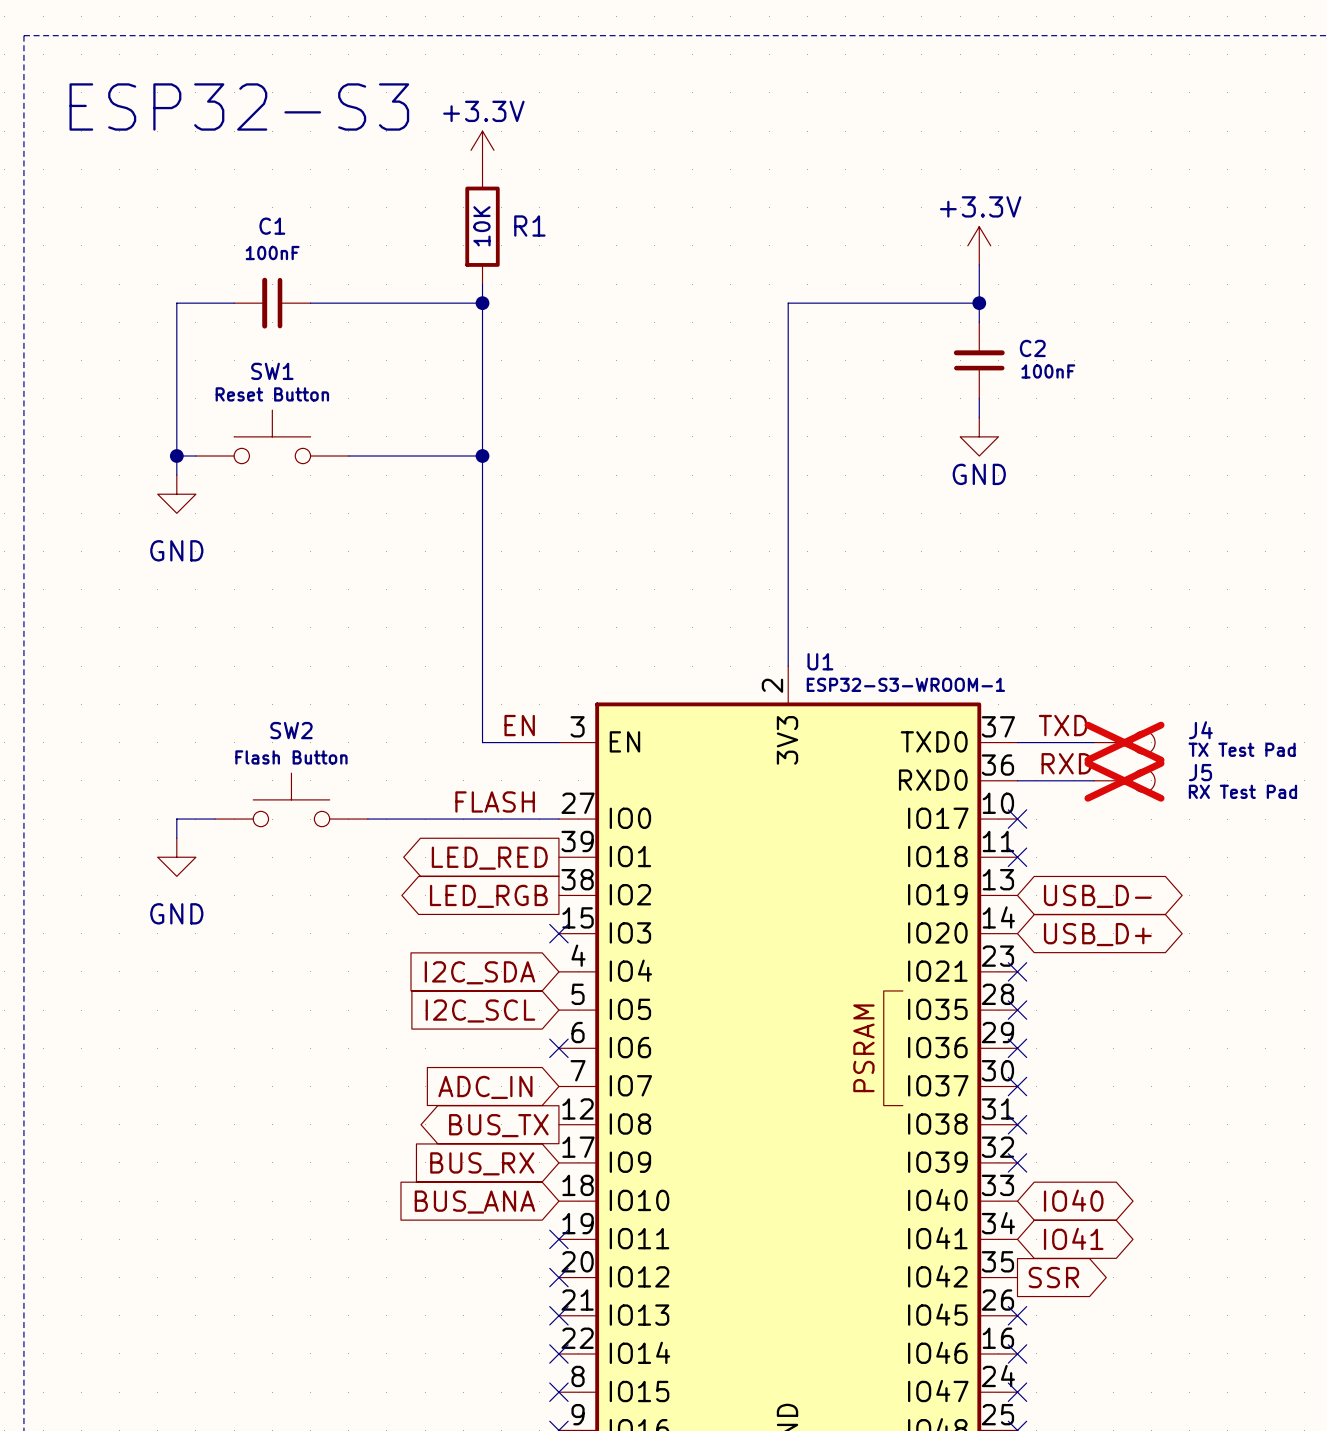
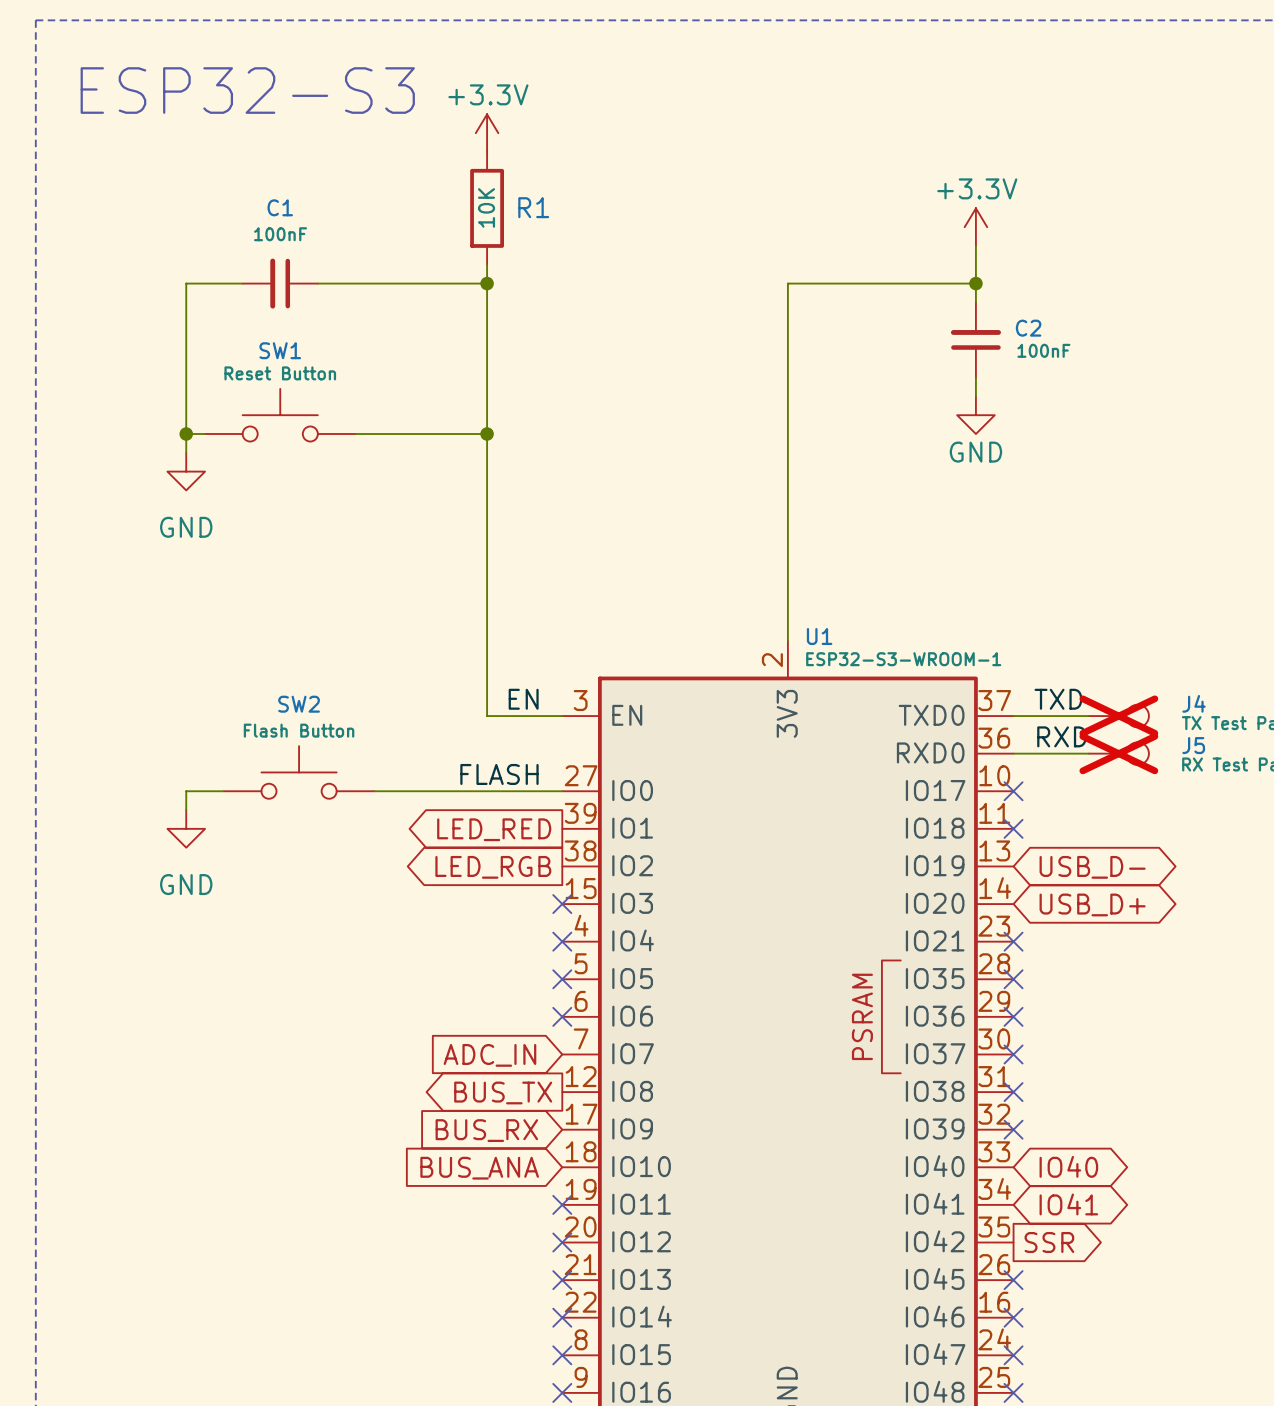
no-connect mark: none -> (562, 941)
global label: I2C_SDA (479, 972) -> none
global label: I2C_SCL (480, 1010) -> none
no-connect mark: none -> (562, 979)

